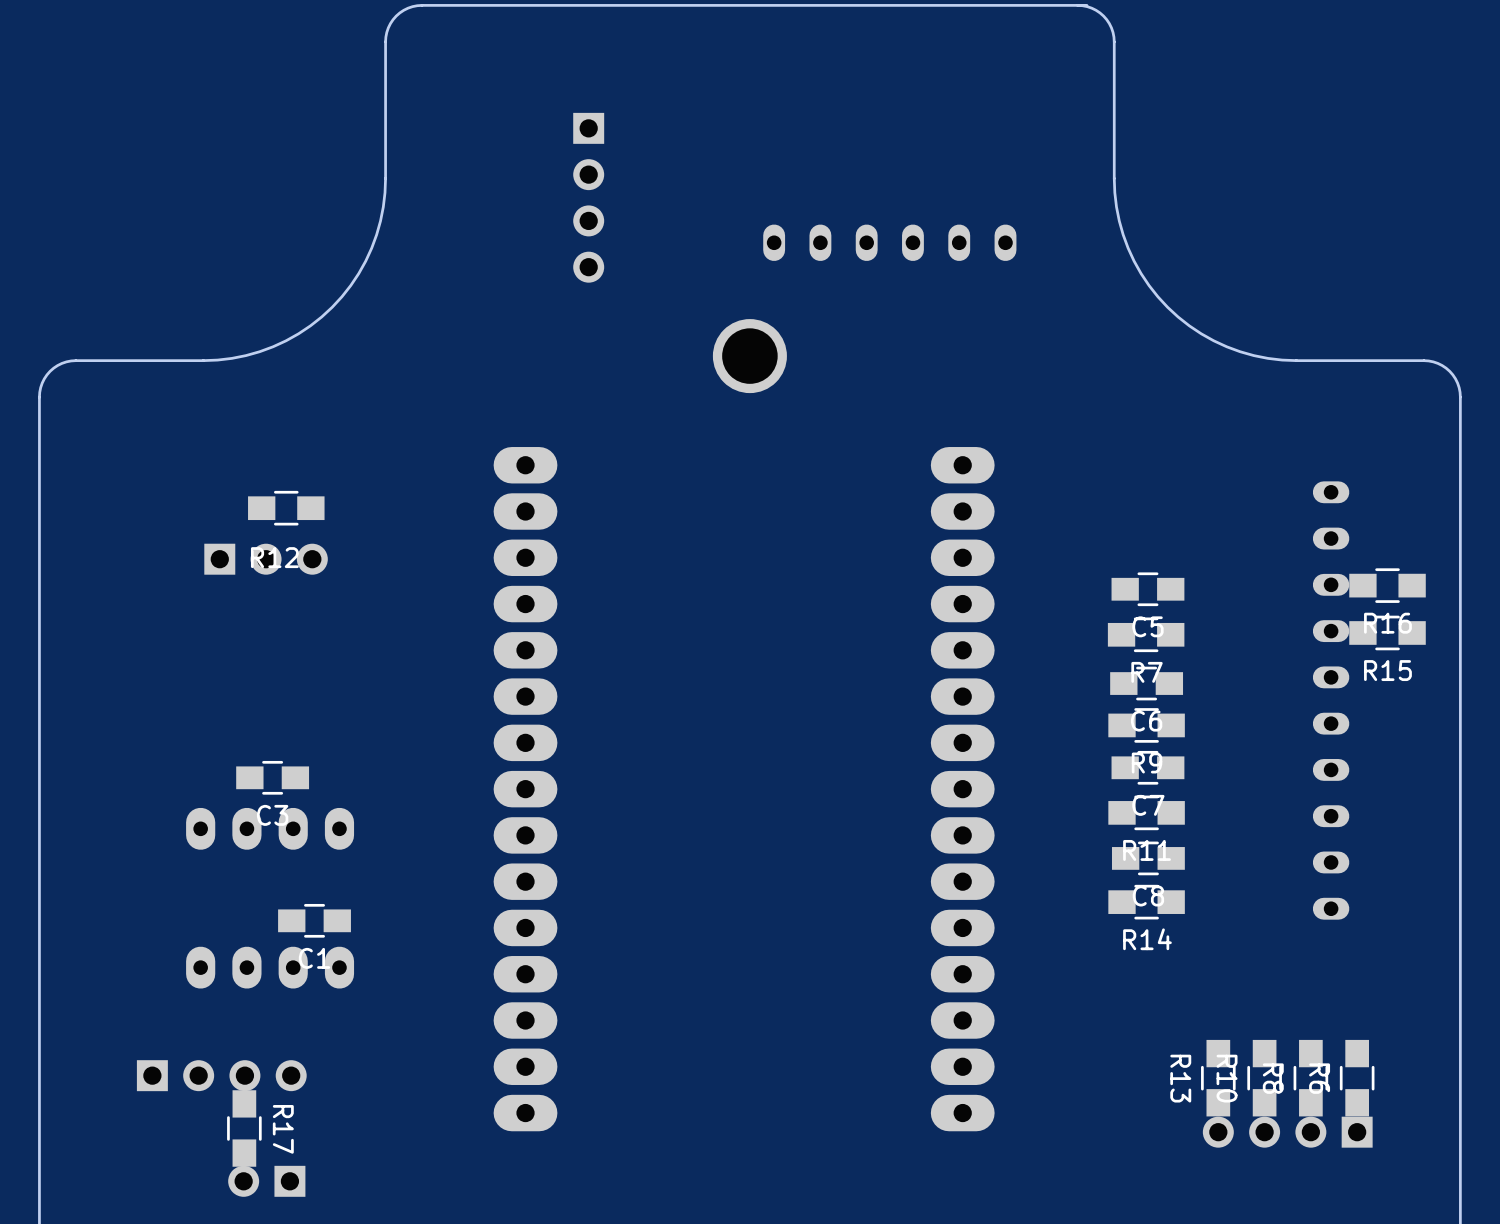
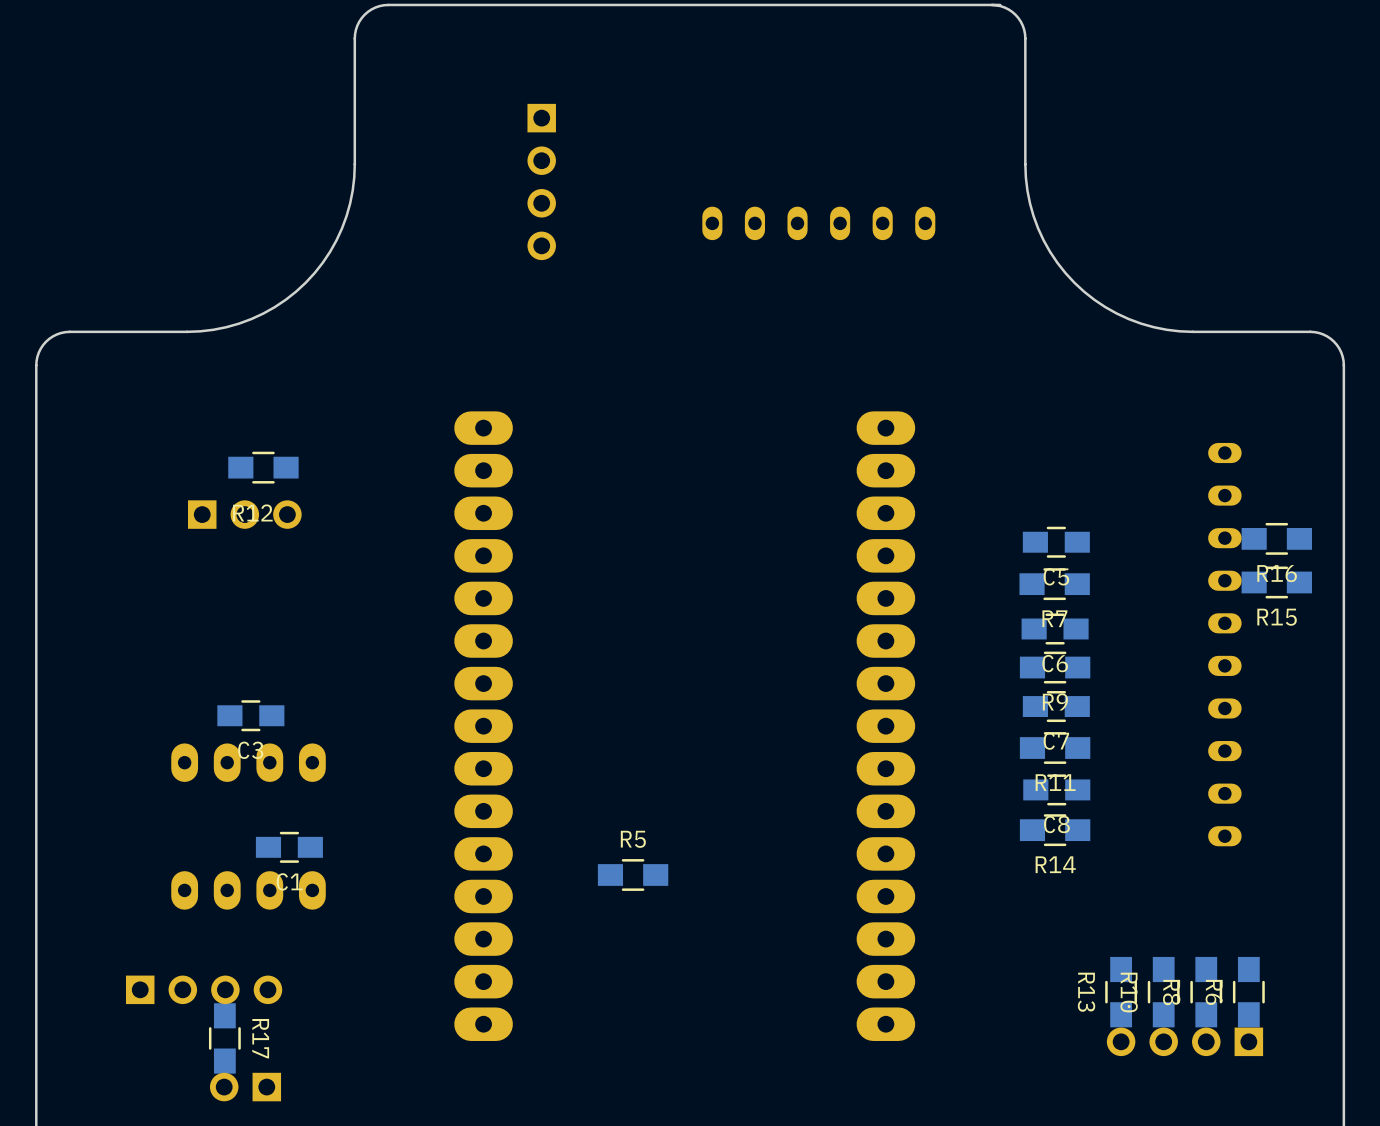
part: (749, 356) -> none
R5: none -> (633, 874)

